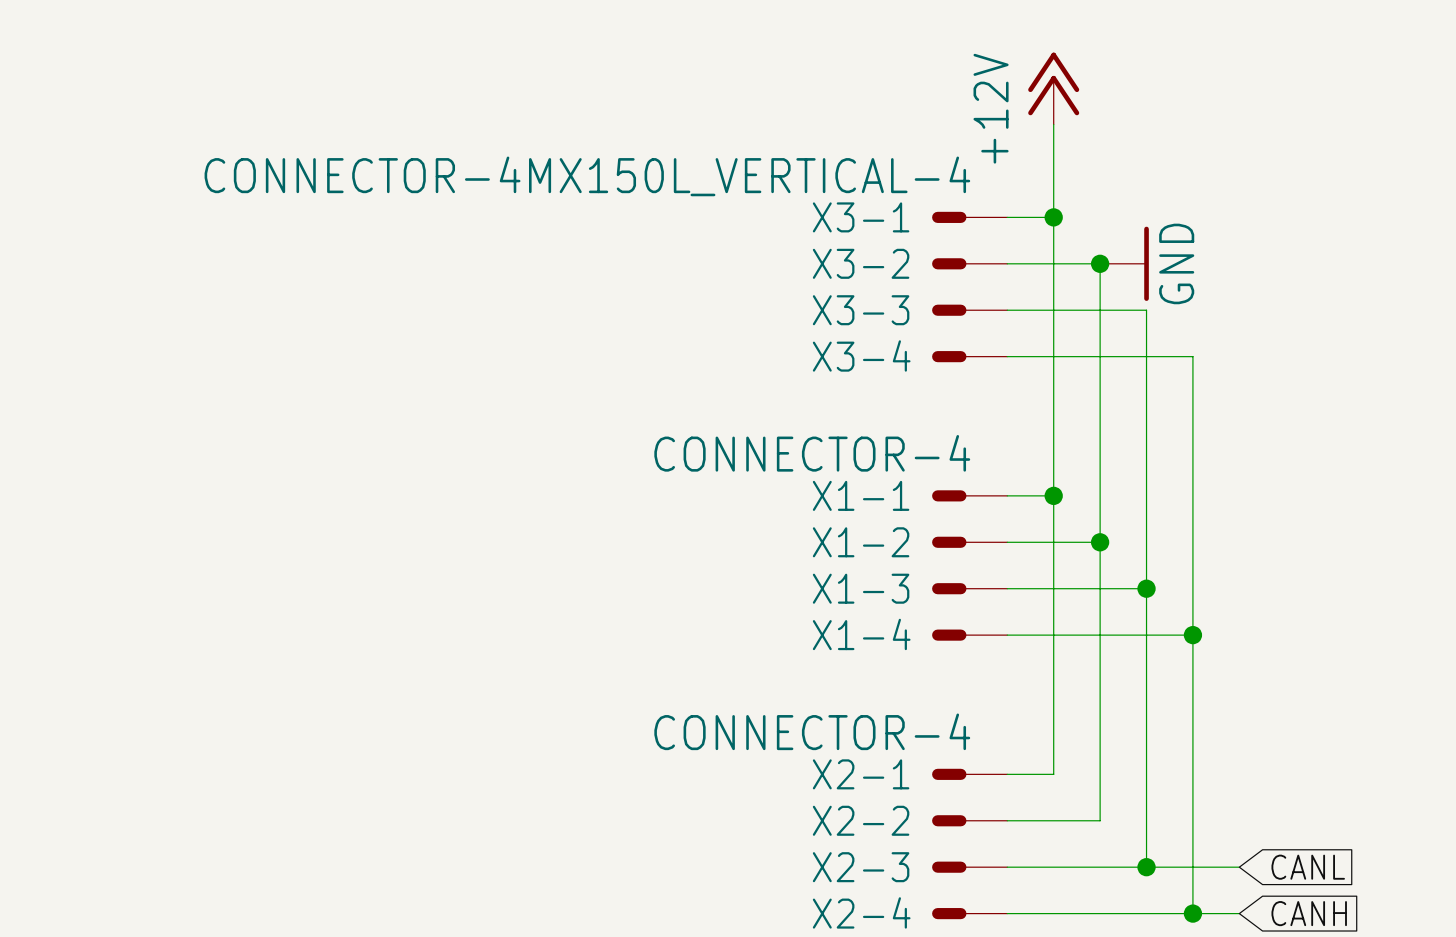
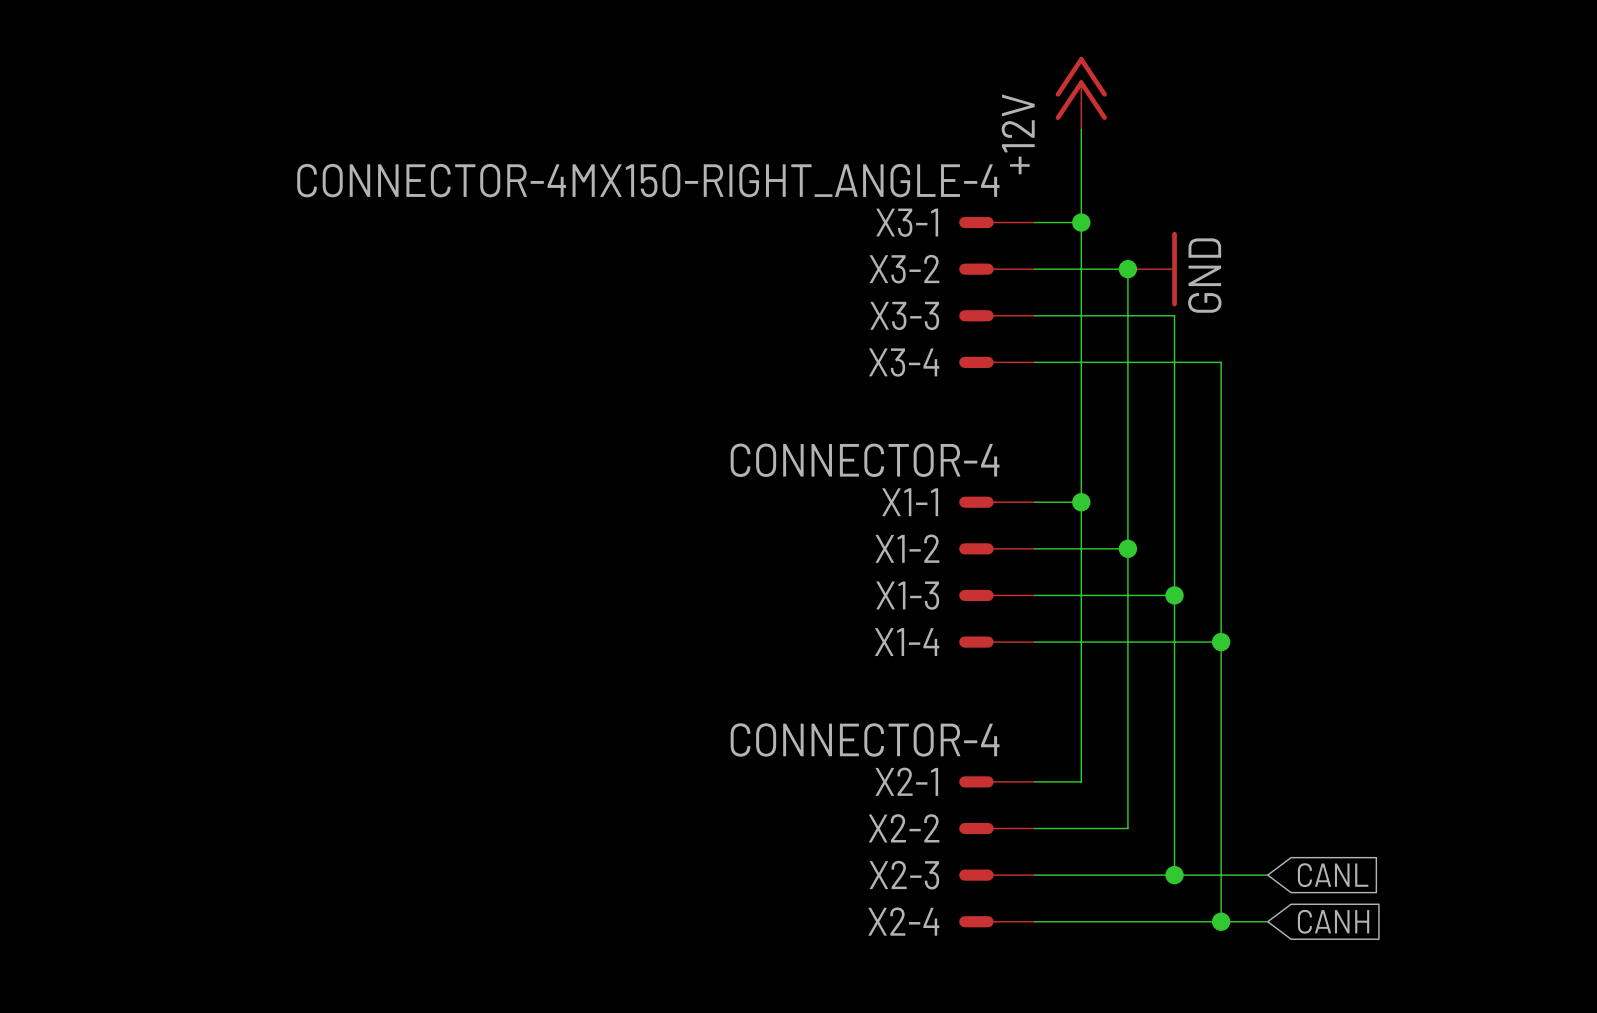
X3-1 value: CONNECTOR-4MX150L_VERTICAL-4 (587, 176) -> CONNECTOR-4MX150-RIGHT_ANGLE-4 (648, 180)

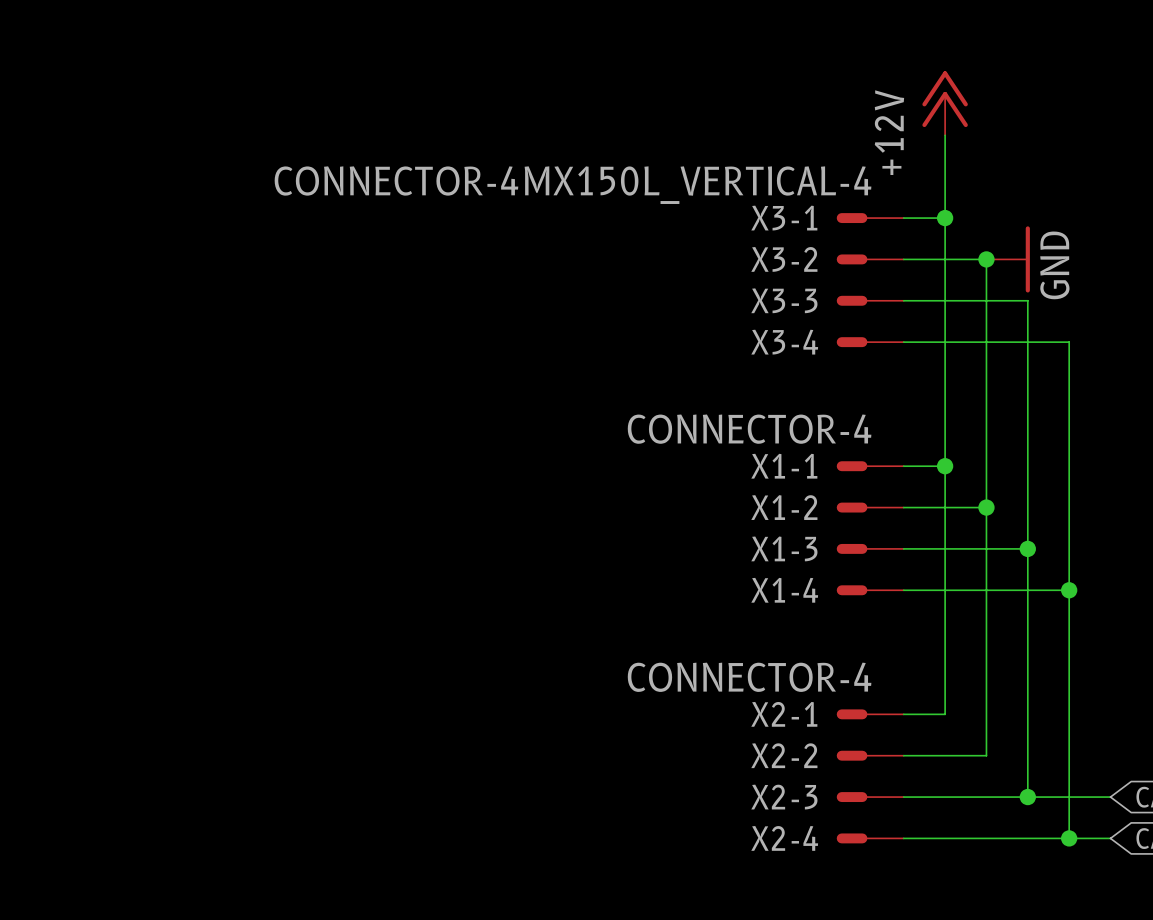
X3-1 value: CONNECTOR-4MX150-RIGHT_ANGLE-4 (648, 180) -> CONNECTOR-4MX150L_VERTICAL-4 (573, 185)

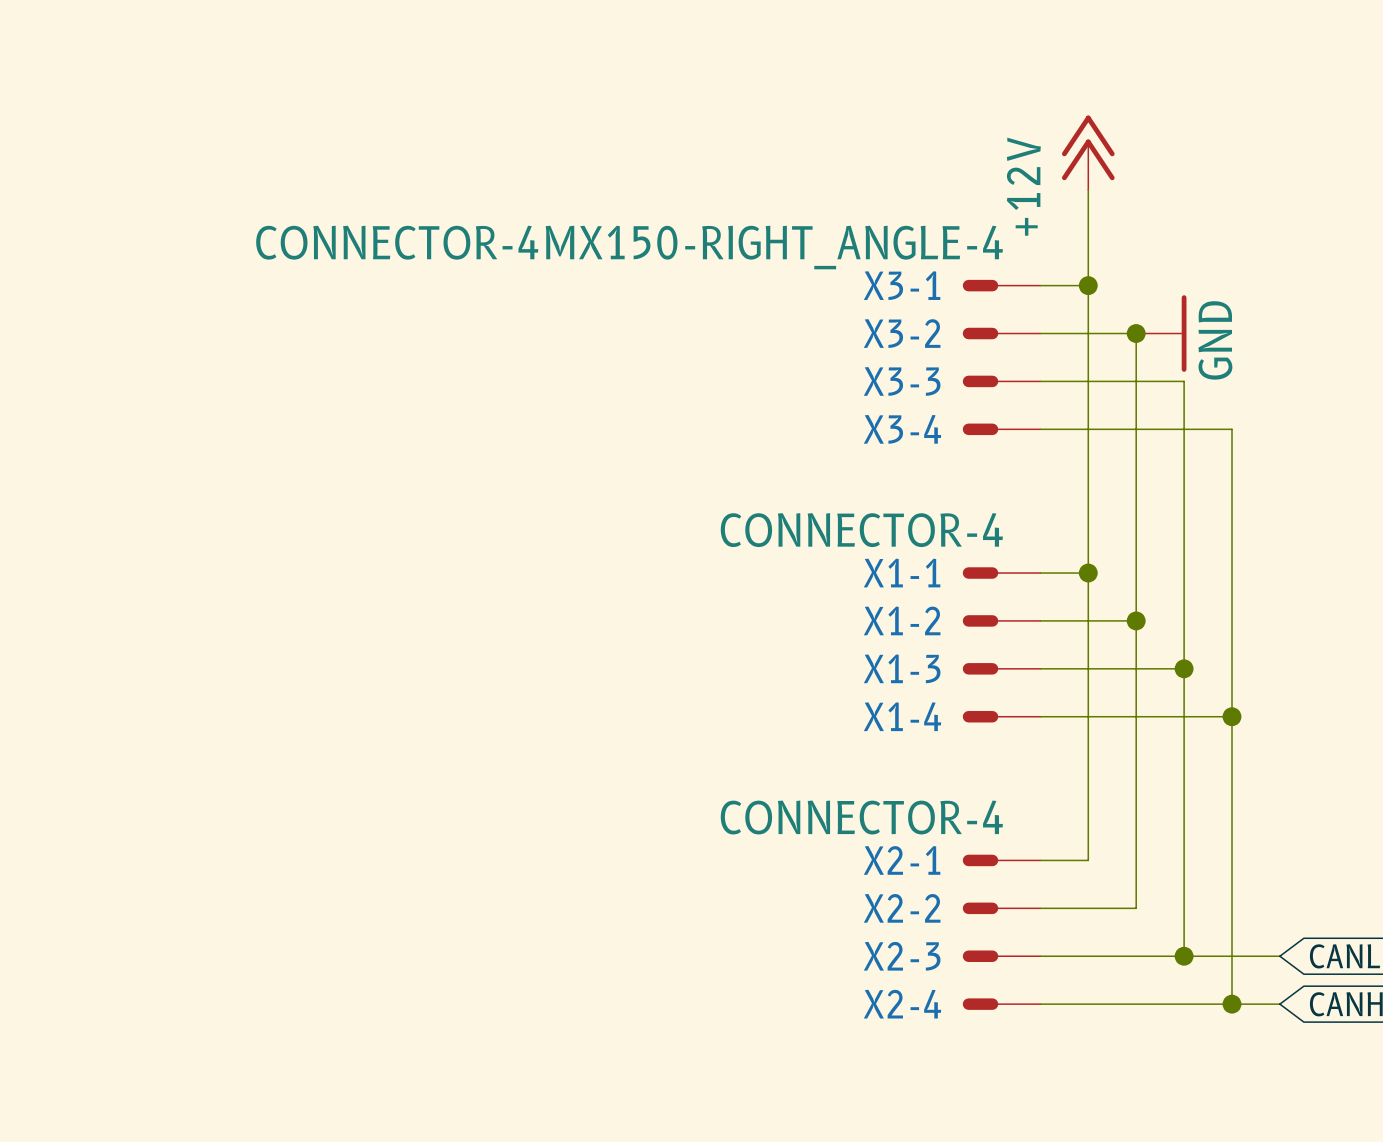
X3-1 value: CONNECTOR-4MX150L_VERTICAL-4 (573, 185) -> CONNECTOR-4MX150-RIGHT_ANGLE-4 (629, 247)

